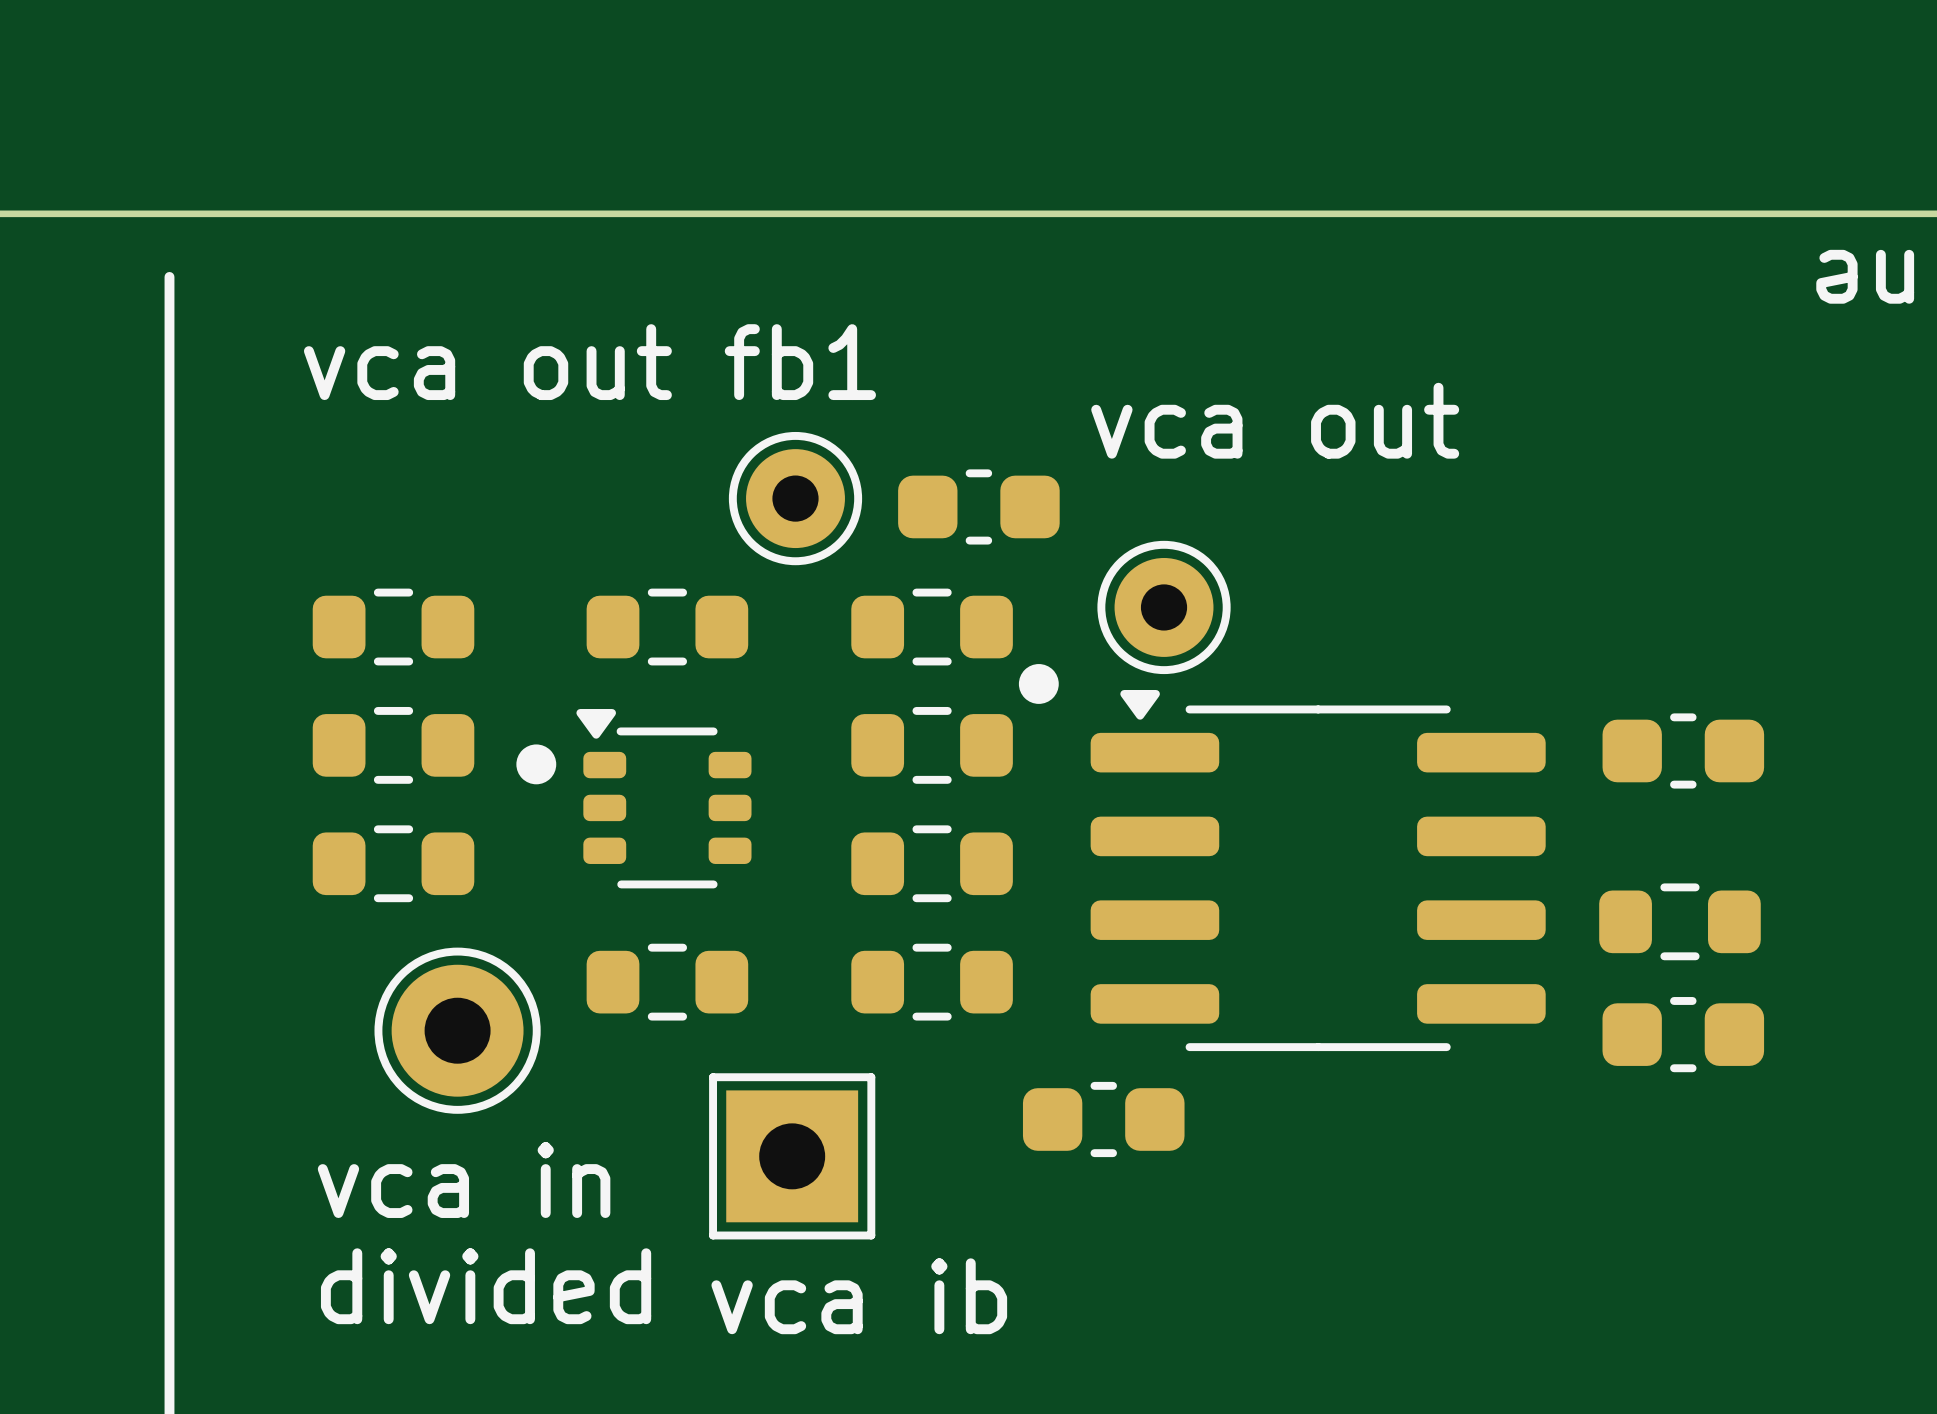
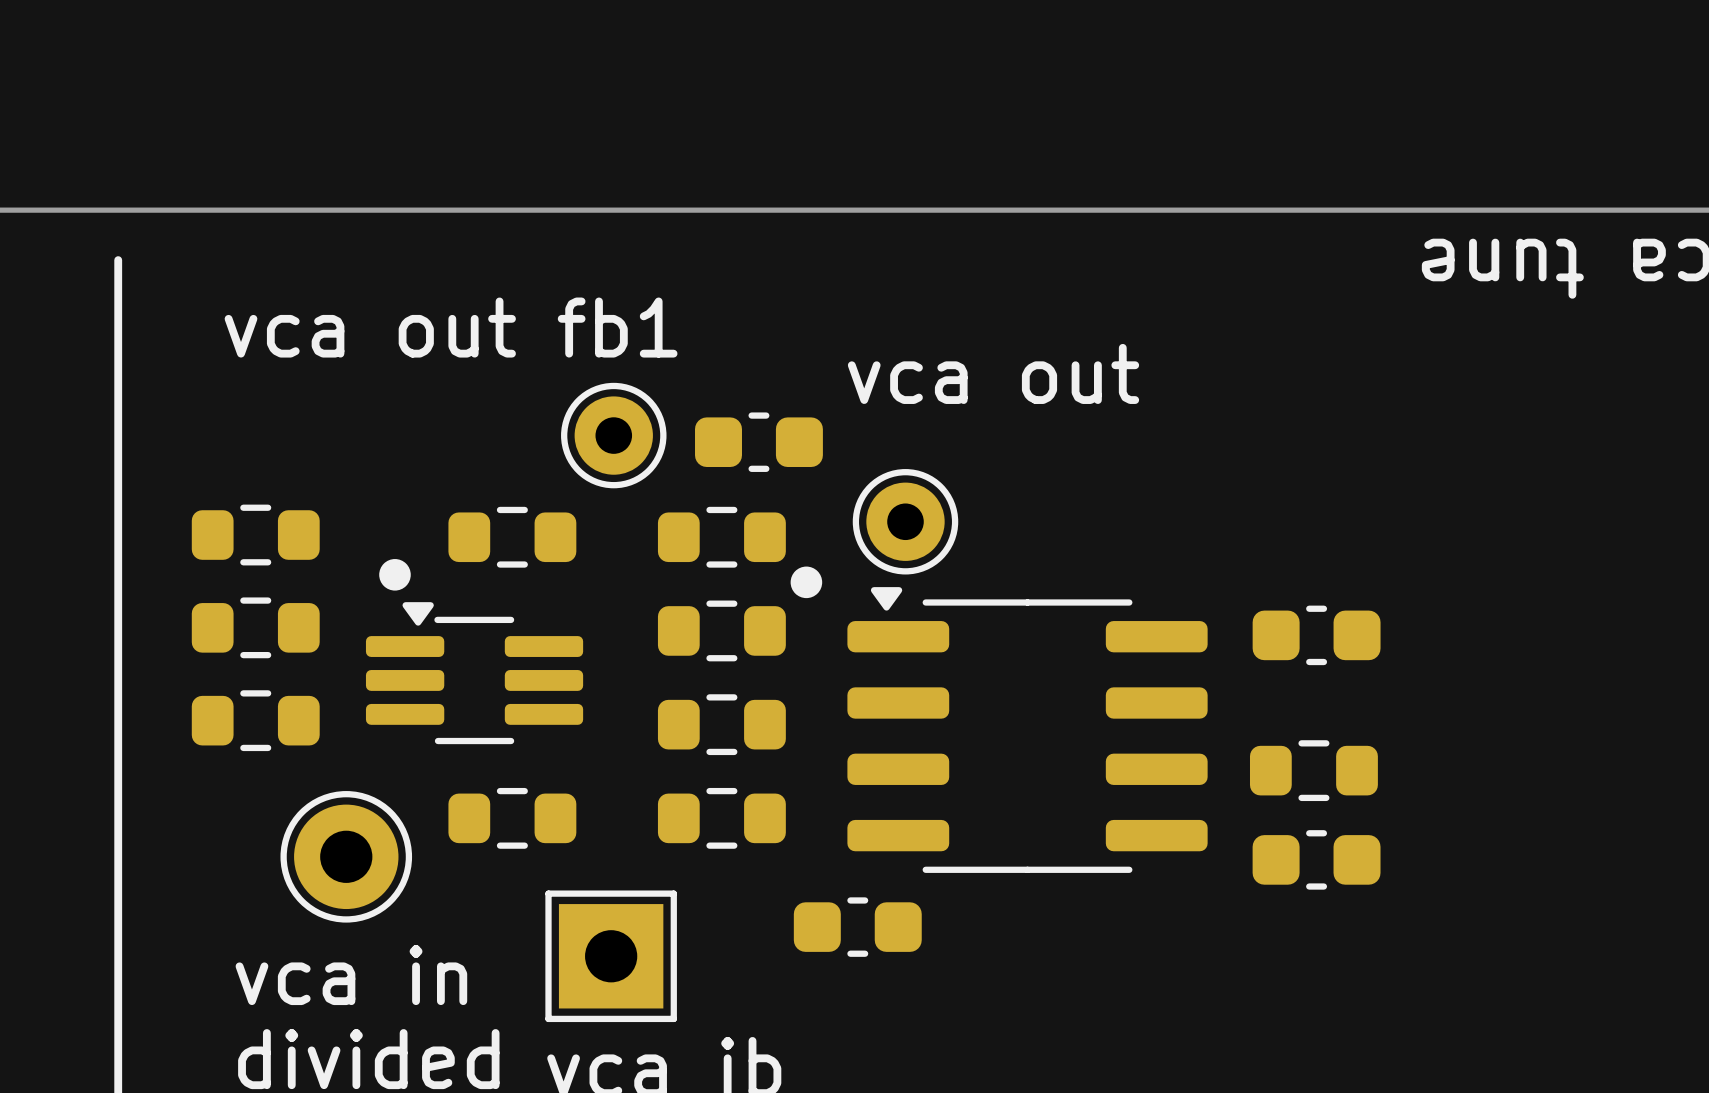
part position: (393, 627) -> (255, 535)
part footprint: [576, 709, 752, 889] -> [365, 602, 584, 745]
part position: (393, 745) -> (255, 627)
drawing position: (536, 764) -> (394, 574)
part position: (393, 863) -> (255, 720)

